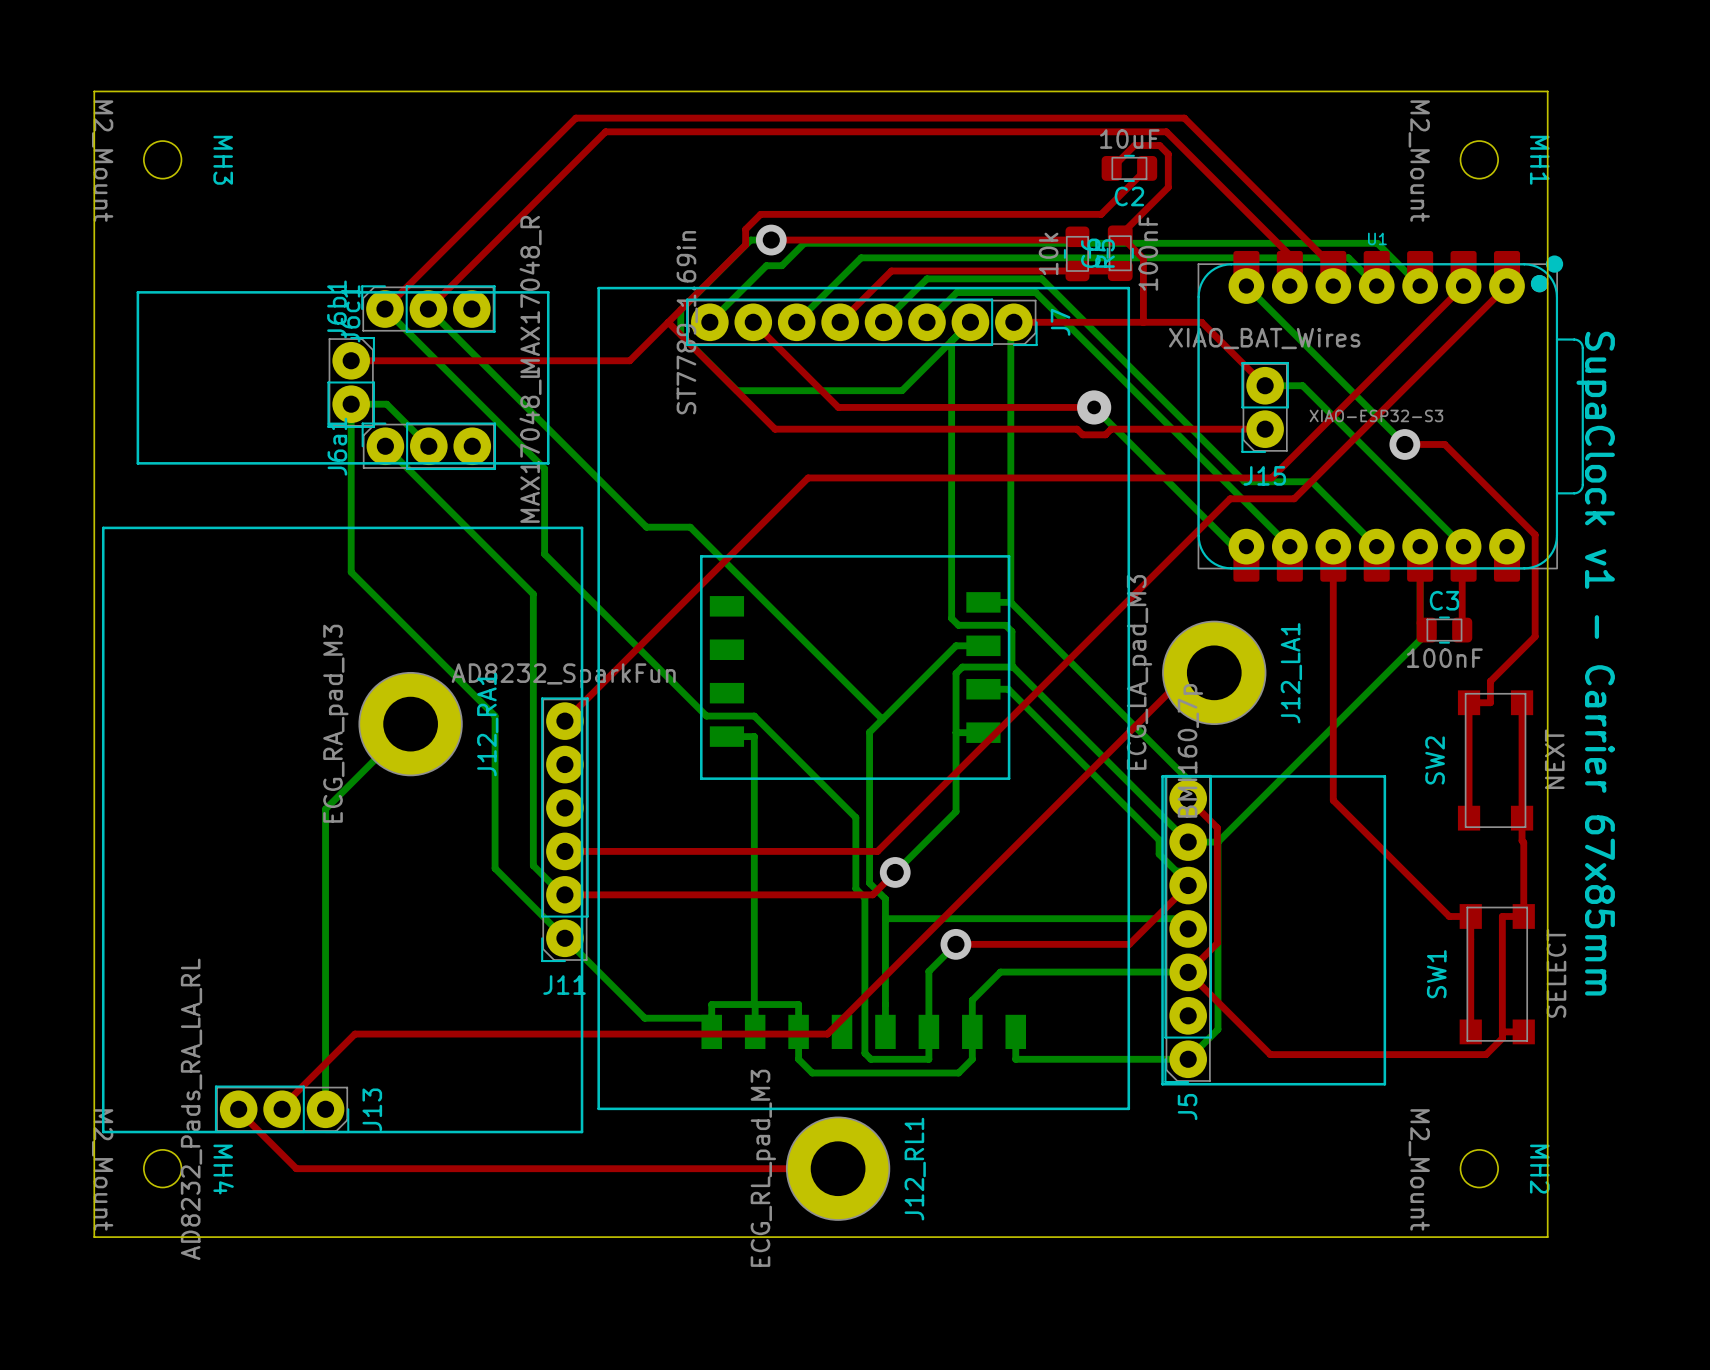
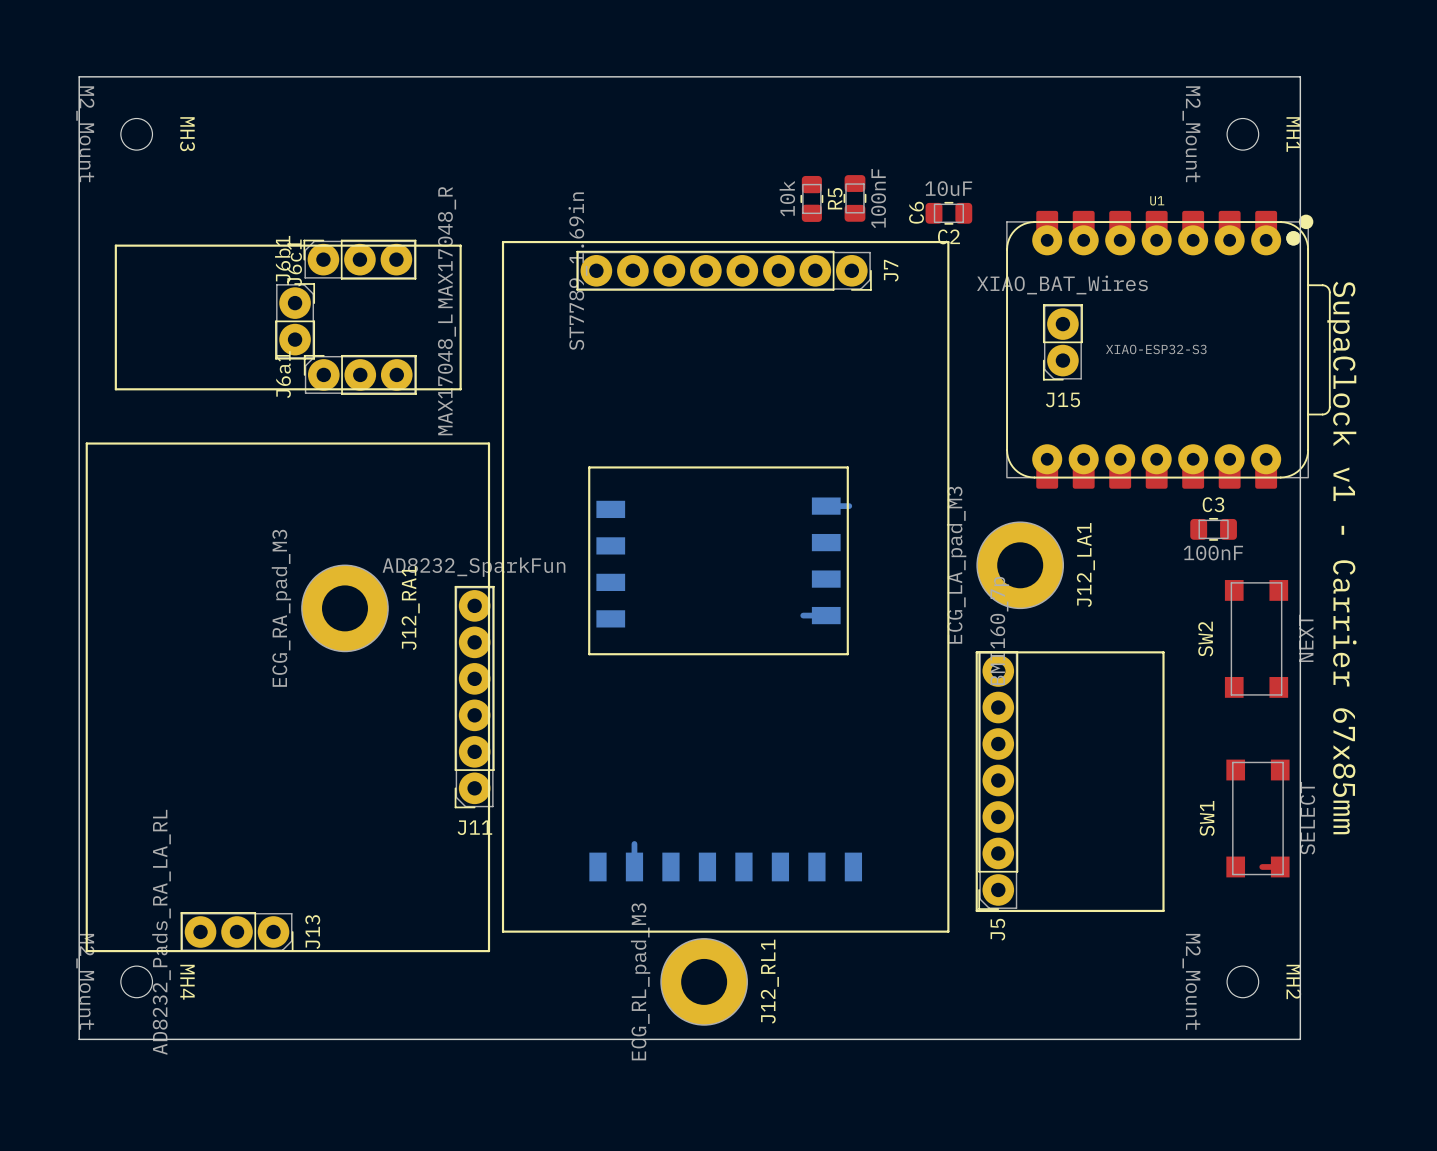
top track: (1111, 168) (1134, 145) (1159, 145) (1168, 154) (1168, 187) (1120, 235) (1143, 258) (1143, 322) -> none
C2 position: (1129, 168) -> (948, 213)
top track: (1147, 168) (1101, 214) (760, 214) (745, 229) (745, 244) (629, 360) (351, 360) -> none
top track: (1077, 236) (1074, 240) (771, 240) -> none
bottom track: (771, 240) (750, 240) (680, 310) (680, 334) (736, 390) (902, 390) (970, 322) (974, 326) -> none
via: (771, 240) -> none
R5 position: (1077, 253) -> (811, 198)
C6 position: (1120, 253) -> (854, 198)
top track: (1120, 271) (891, 271) (840, 322) -> none
top track: (1463, 271) (1463, 286) (1271, 477) (808, 477) (564, 721) -> none
top track: (1507, 271) (1507, 286) (1294, 498) (1230, 498) (877, 851) (564, 851) -> none
bottom track: (1246, 286) (1404, 444) -> none
top track: (1289, 286) (1289, 255) (1166, 131) (605, 131) (428, 309) -> none
top track: (1333, 286) (1333, 267) (1184, 118) (575, 118) (384, 309) -> none
bottom track: (1376, 286) (1348, 257) (861, 257) (796, 322) -> none
bottom track: (1420, 286) (1377, 243) (804, 243) (781, 265) (766, 265) (709, 322) -> none
bottom track: (384, 309) (544, 468) (544, 554) (706, 716) (754, 716) (855, 817) (855, 888) (864, 897) (864, 1053) (870, 1059) (928, 1059) (928, 971) (955, 944) -> none
bottom track: (428, 309) (646, 527) (690, 527) (882, 719) -> none
top track: (668, 322) (775, 429) (1077, 429) (1082, 434) (1105, 434) (1111, 429) (1265, 429) -> none
top track: (753, 322) (838, 407) (1094, 407) -> none
bottom track: (883, 322) (927, 278) (1041, 278) (1244, 481) (1311, 481) (1376, 546) -> none
bottom track: (927, 322) (956, 292) (1035, 292) (1289, 546) -> none
top track: (1013, 322) (1201, 322) (1265, 385) -> none
bottom track: (1013, 322) (1010, 325) (1010, 602) (1188, 779) (1188, 798) -> none
bottom track: (951, 341) (951, 618) (958, 625) (1005, 625) (1011, 631) (1011, 667) -> none
bottom track: (1265, 385) (1302, 385) (1463, 546) -> none
bottom track: (1094, 407) (1233, 546) (1246, 546) -> none
via: (1094, 407) -> none
top track: (1404, 444) (1444, 444) (1535, 534) (1535, 636) (1490, 681) (1490, 702) (1469, 702) (1469, 818) -> none
via: (1404, 444) -> none
bottom track: (385, 446) (533, 594) (533, 865) (562, 894) (564, 894) -> none
bottom track: (428, 446) (386, 404) (351, 404) (351, 572) (495, 716) (495, 868) (644, 1018) (711, 1018) -> none
top track: (1333, 546) (1333, 800) (1449, 916) (1470, 916) (1470, 1031) -> none
top track: (1420, 546) (1420, 623) (1426, 630) -> none
bottom track: (1420, 546) (1420, 639) (1217, 842) -> none
top track: (1463, 546) (1462, 630) -> none
bottom track: (983, 645) (956, 645) (869, 732) (869, 883) (885, 898) (885, 1031) -> none
top track: (1214, 672) (1188, 672) (827, 1034) (354, 1034) (282, 1106) (282, 1109) -> none
bottom track: (983, 689) (1008, 689) (1159, 839) (1159, 854) (1176, 871) (1188, 871) (1188, 885) -> none
top track: (1522, 702) (1523, 916) (1502, 916) (1502, 1038) (1486, 1054) (1270, 1054) (1188, 972) (1217, 943) (1217, 827) (1188, 798) -> none
bottom track: (410, 724) (325, 809) (325, 1109) -> none
bottom track: (726, 736) (754, 736) (754, 1004) -> none
bottom track: (1217, 842) (1217, 1029) (1188, 1059) (1015, 1059) (1015, 1031) -> none
bottom track: (1217, 842) (1188, 842) (1013, 667) (962, 667) (956, 673) (956, 811) (895, 872) -> none
top track: (895, 872) (872, 894) (564, 894) -> none
via: (895, 872) -> none
top track: (1188, 885) (1129, 944) (955, 944) -> none
bottom track: (885, 918) (1177, 918) (1188, 928) -> none
via: (955, 944) -> none
bottom track: (1188, 972) (1000, 972) (972, 1000) (972, 1059) (958, 1073) (812, 1073) (798, 1059) (798, 1004) (711, 1004) (711, 1031) -> none
top track: (238, 1109) (296, 1168) (838, 1168) -> none

